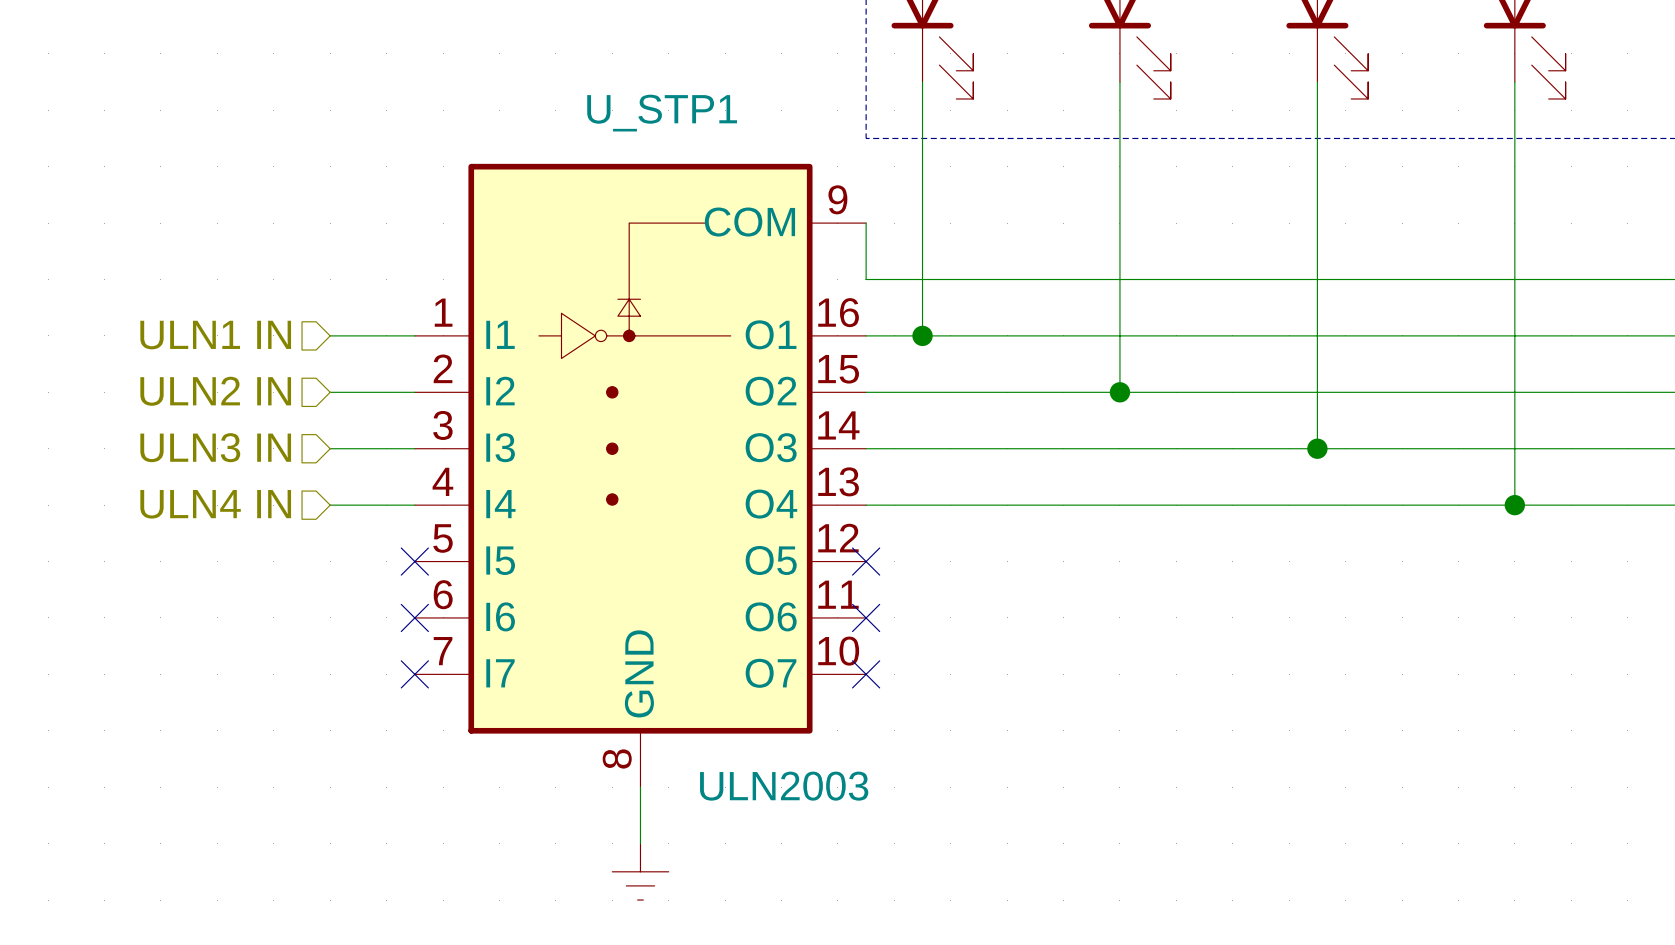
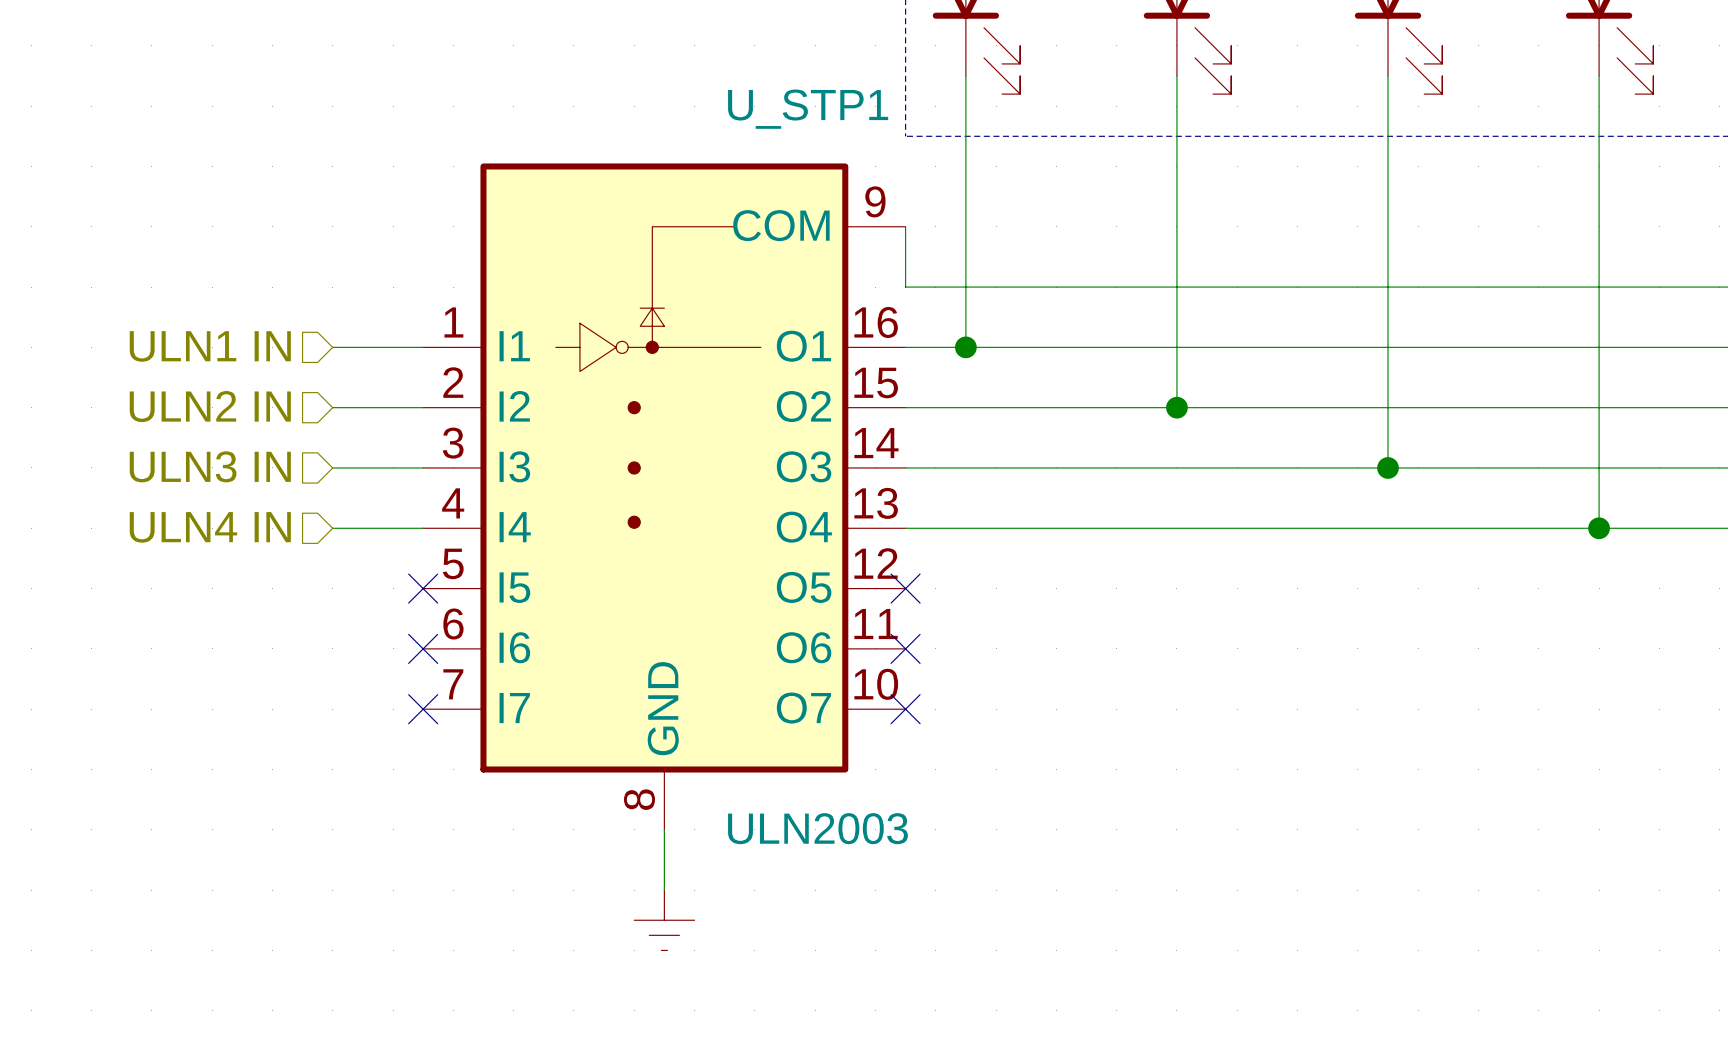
U_STP1 name position: U_STP1 (662, 113) -> U_STP1 (808, 109)

